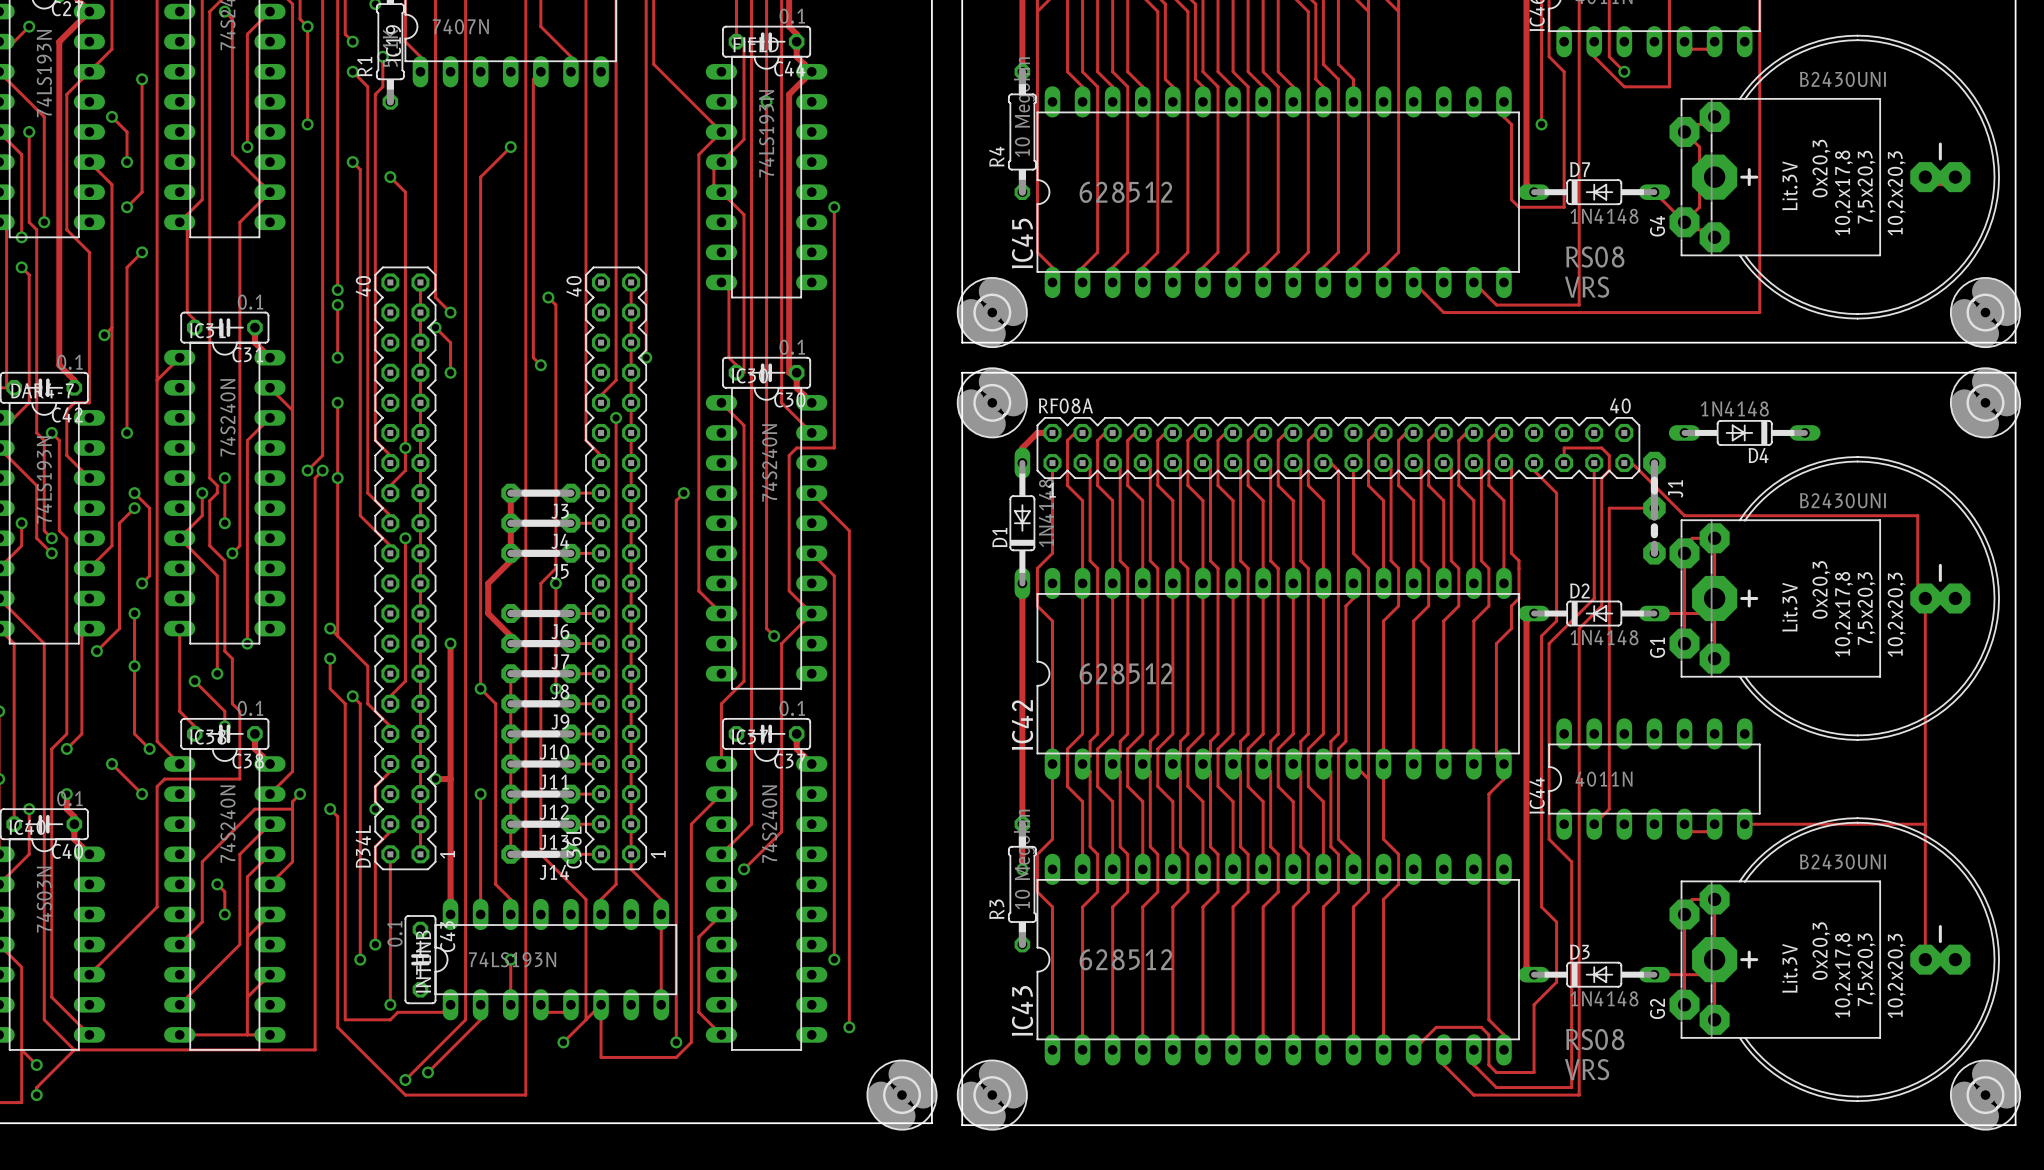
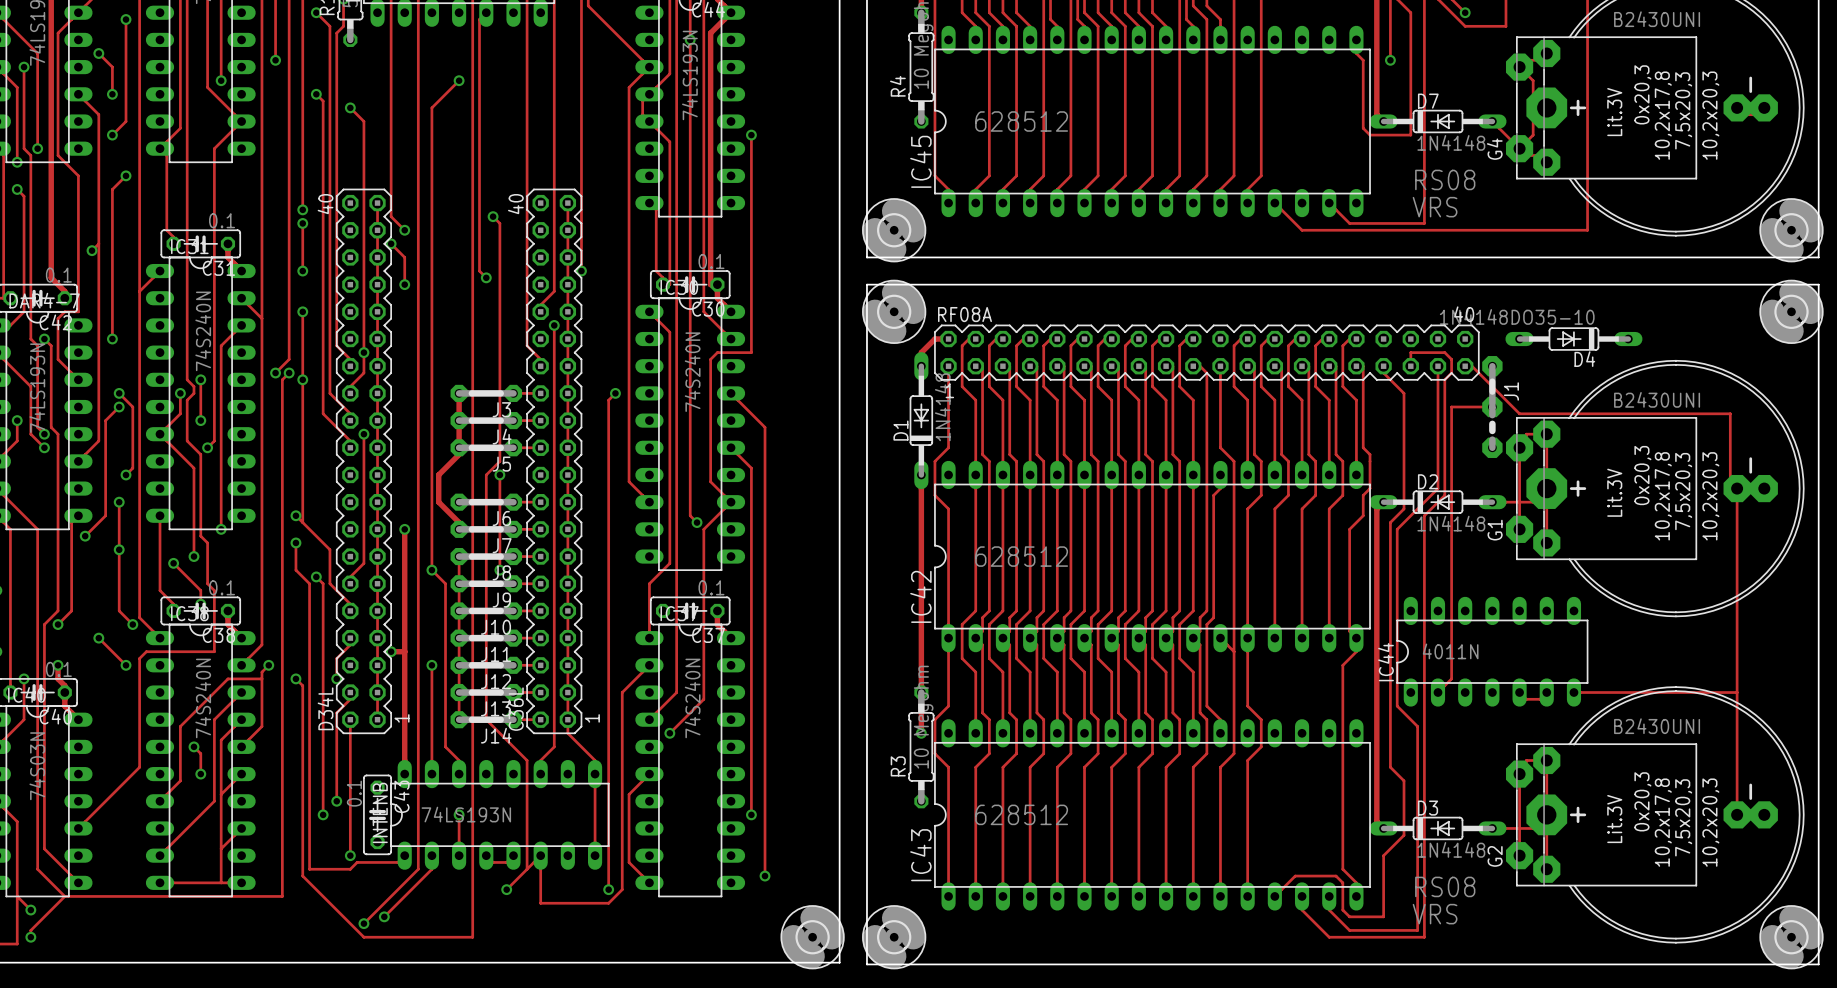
D4 value: 1N4148 (1734, 408) -> 1N4148DO35-10 (1517, 316)

